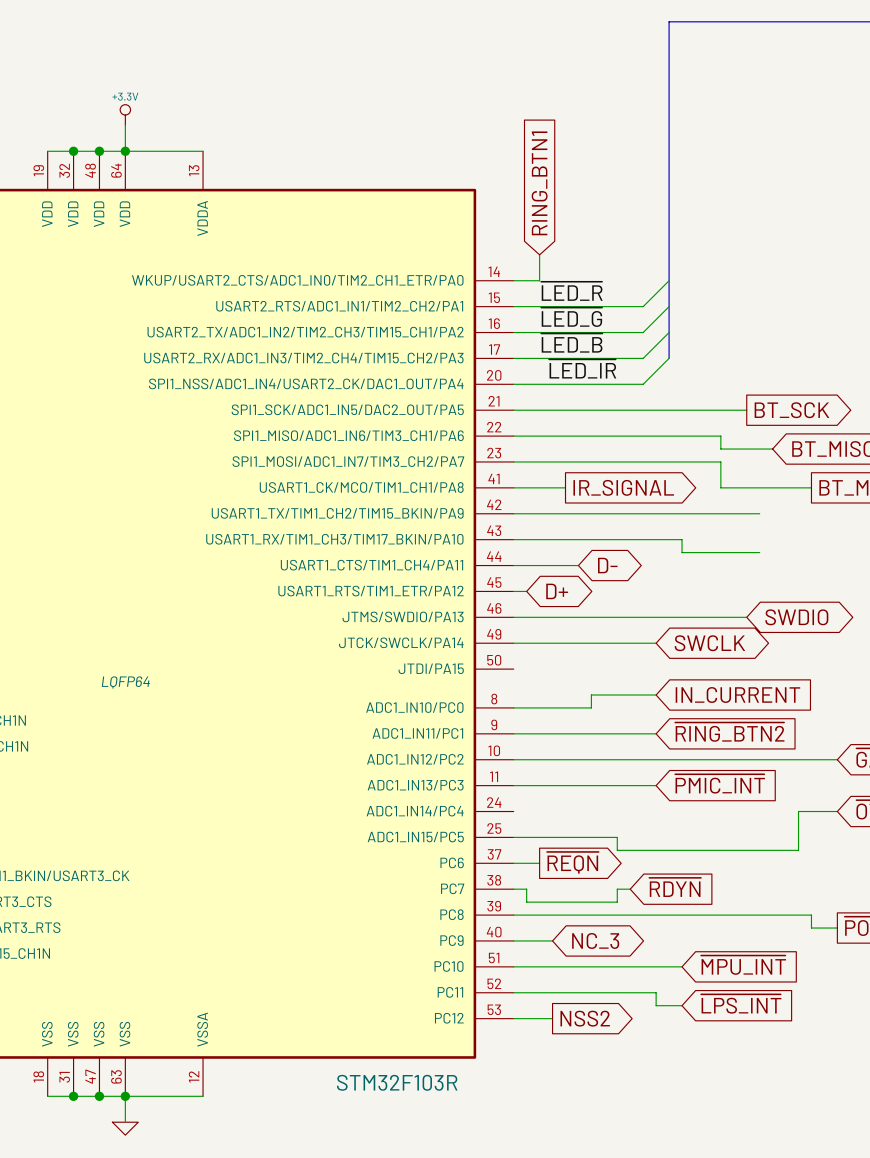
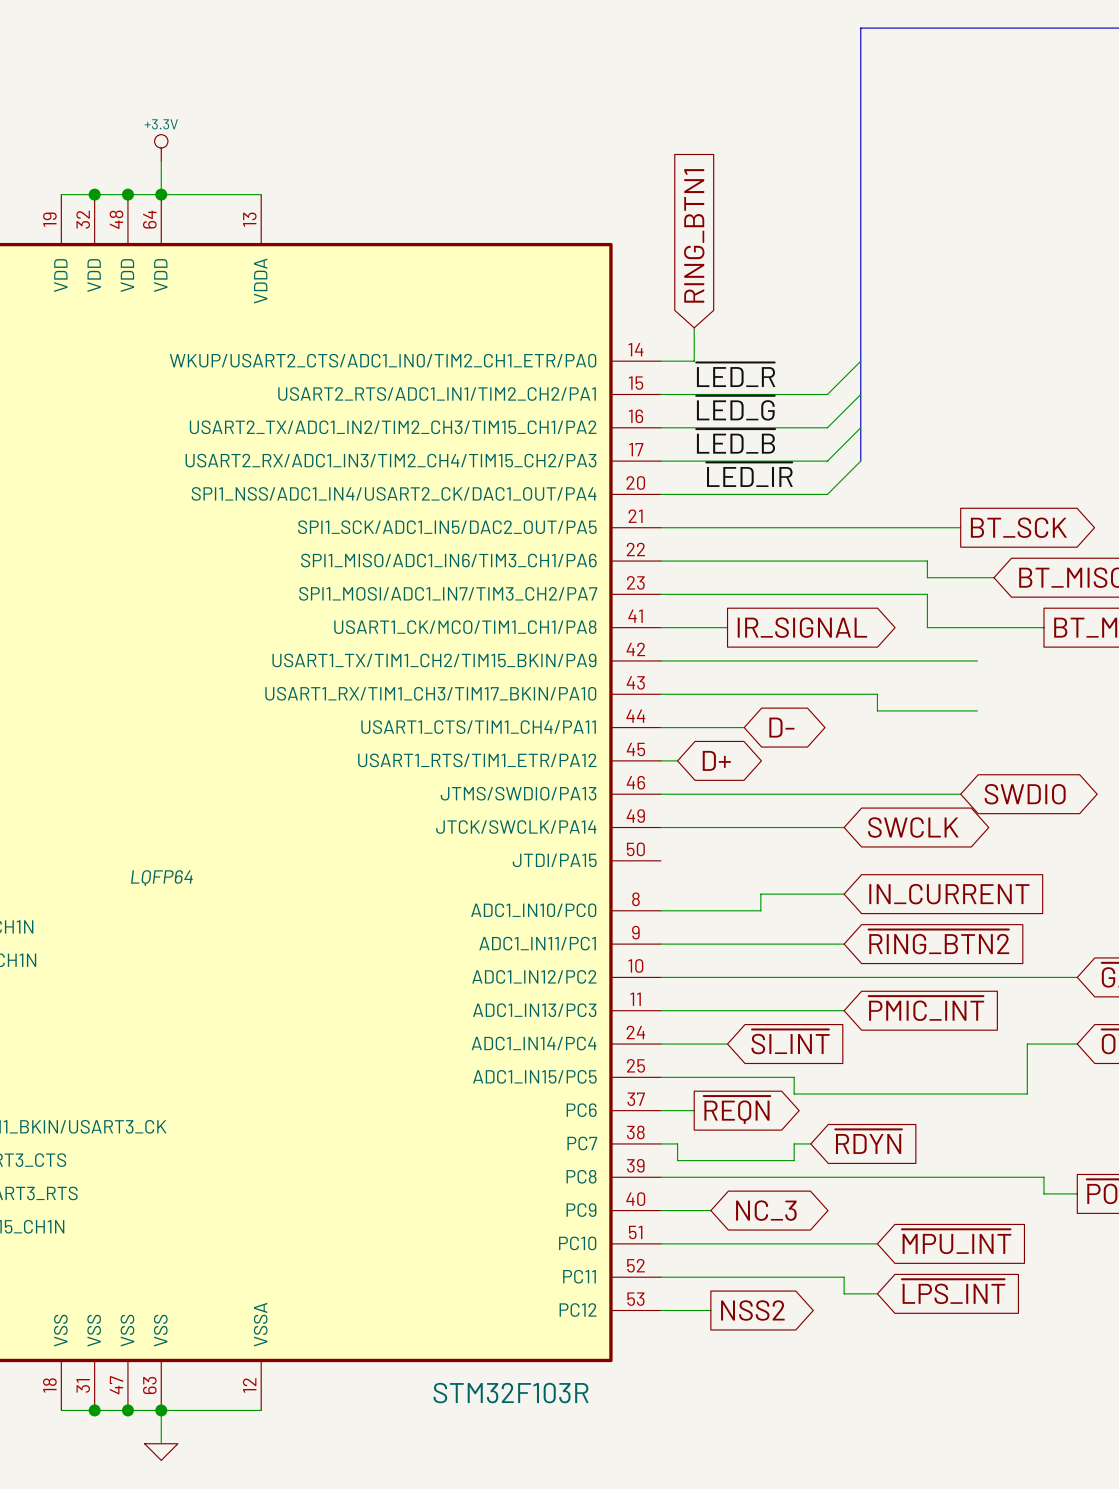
global label: none -> ~{SI_INT} (790, 1041)
wire: none -> (660, 1044) (727, 1044)

